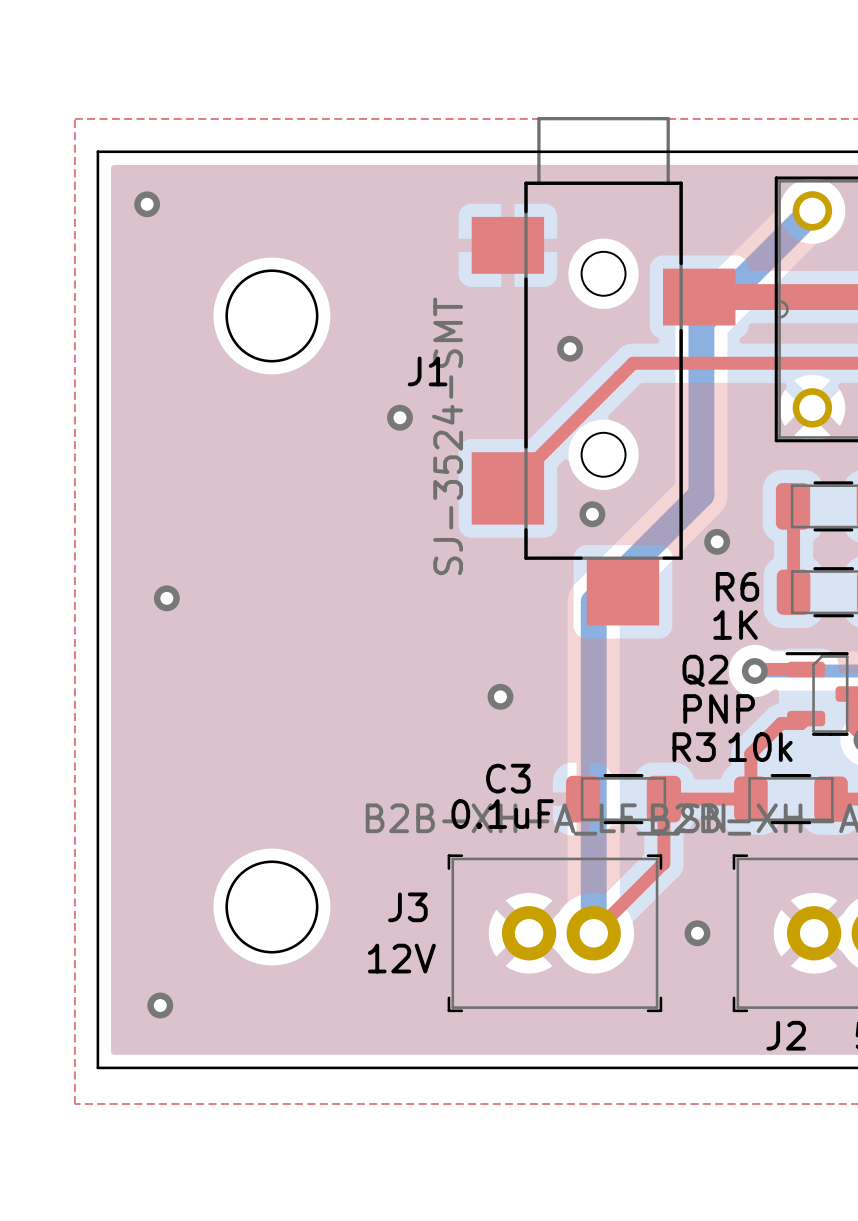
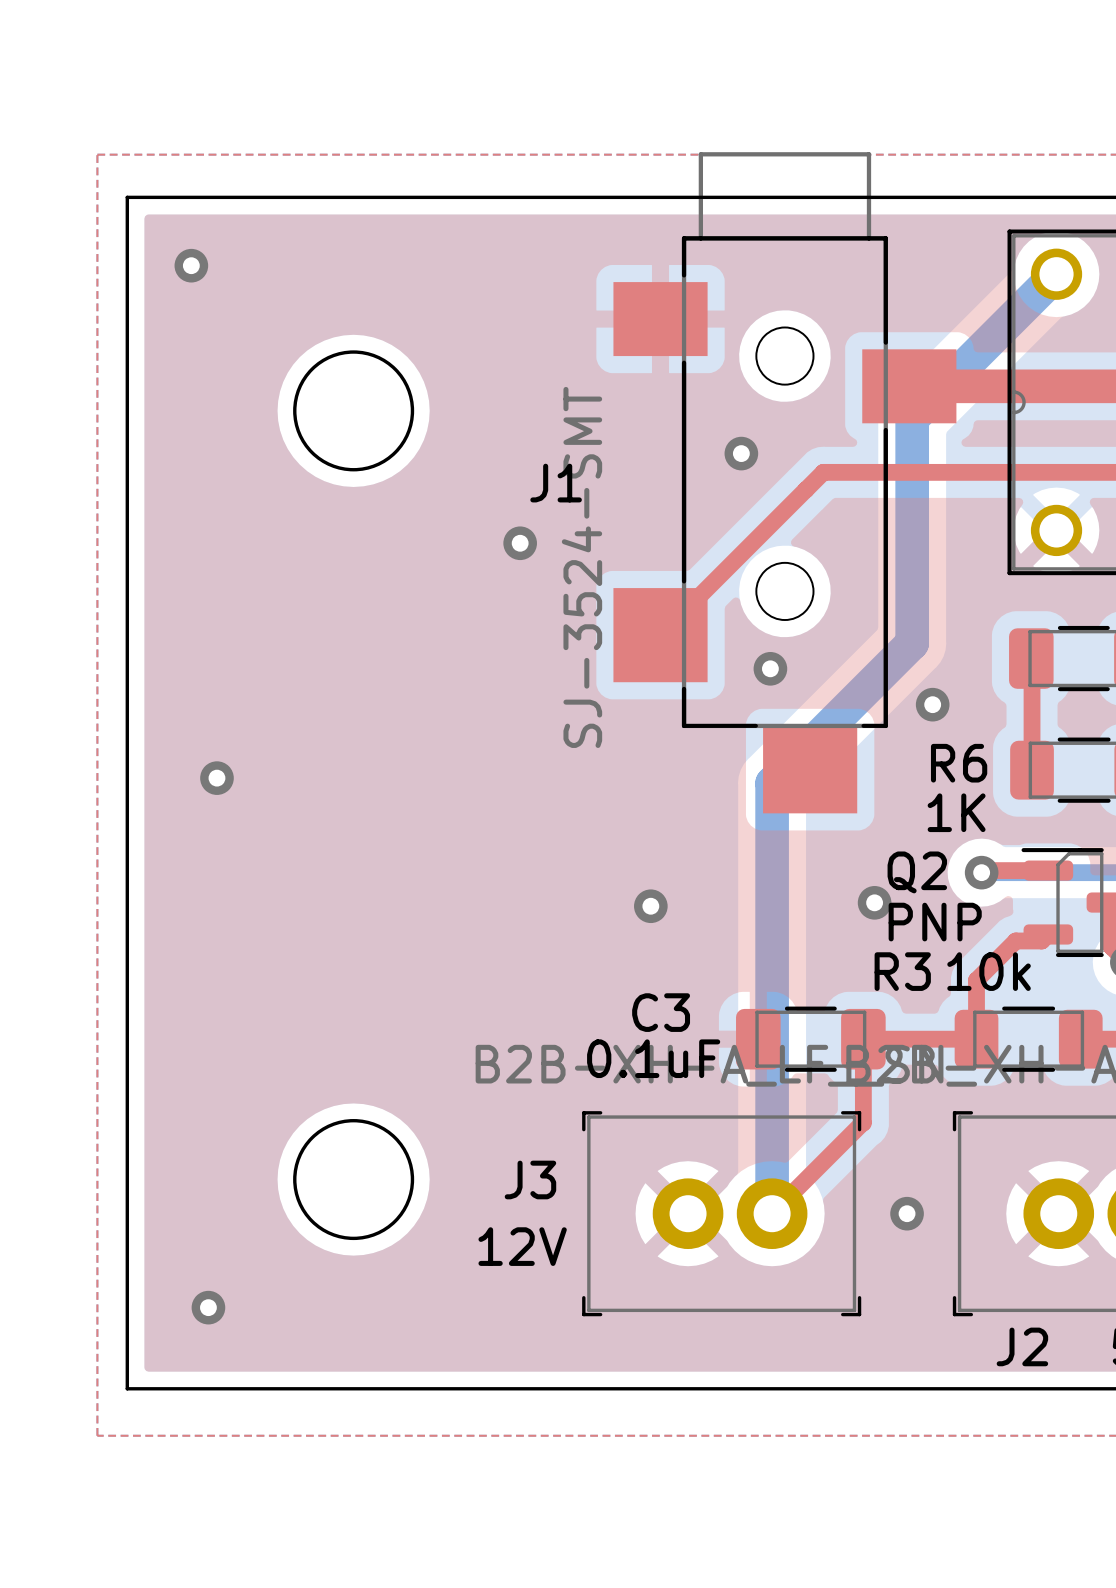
via: none -> (874, 902)

